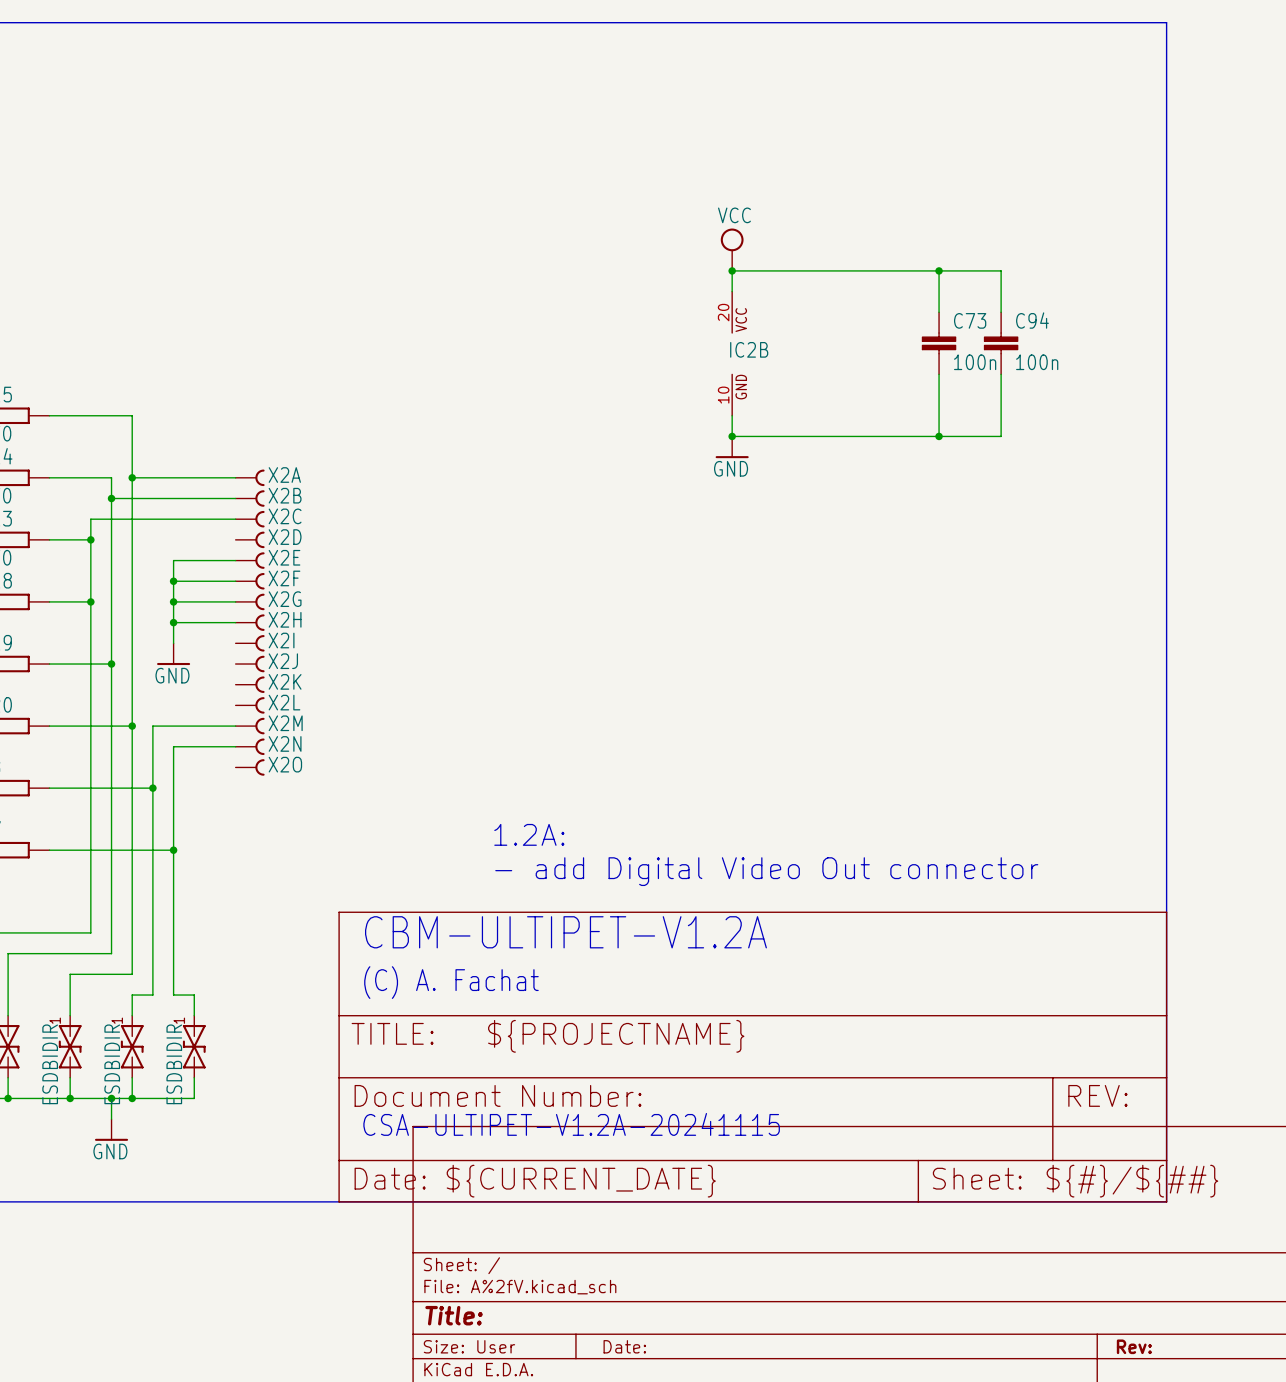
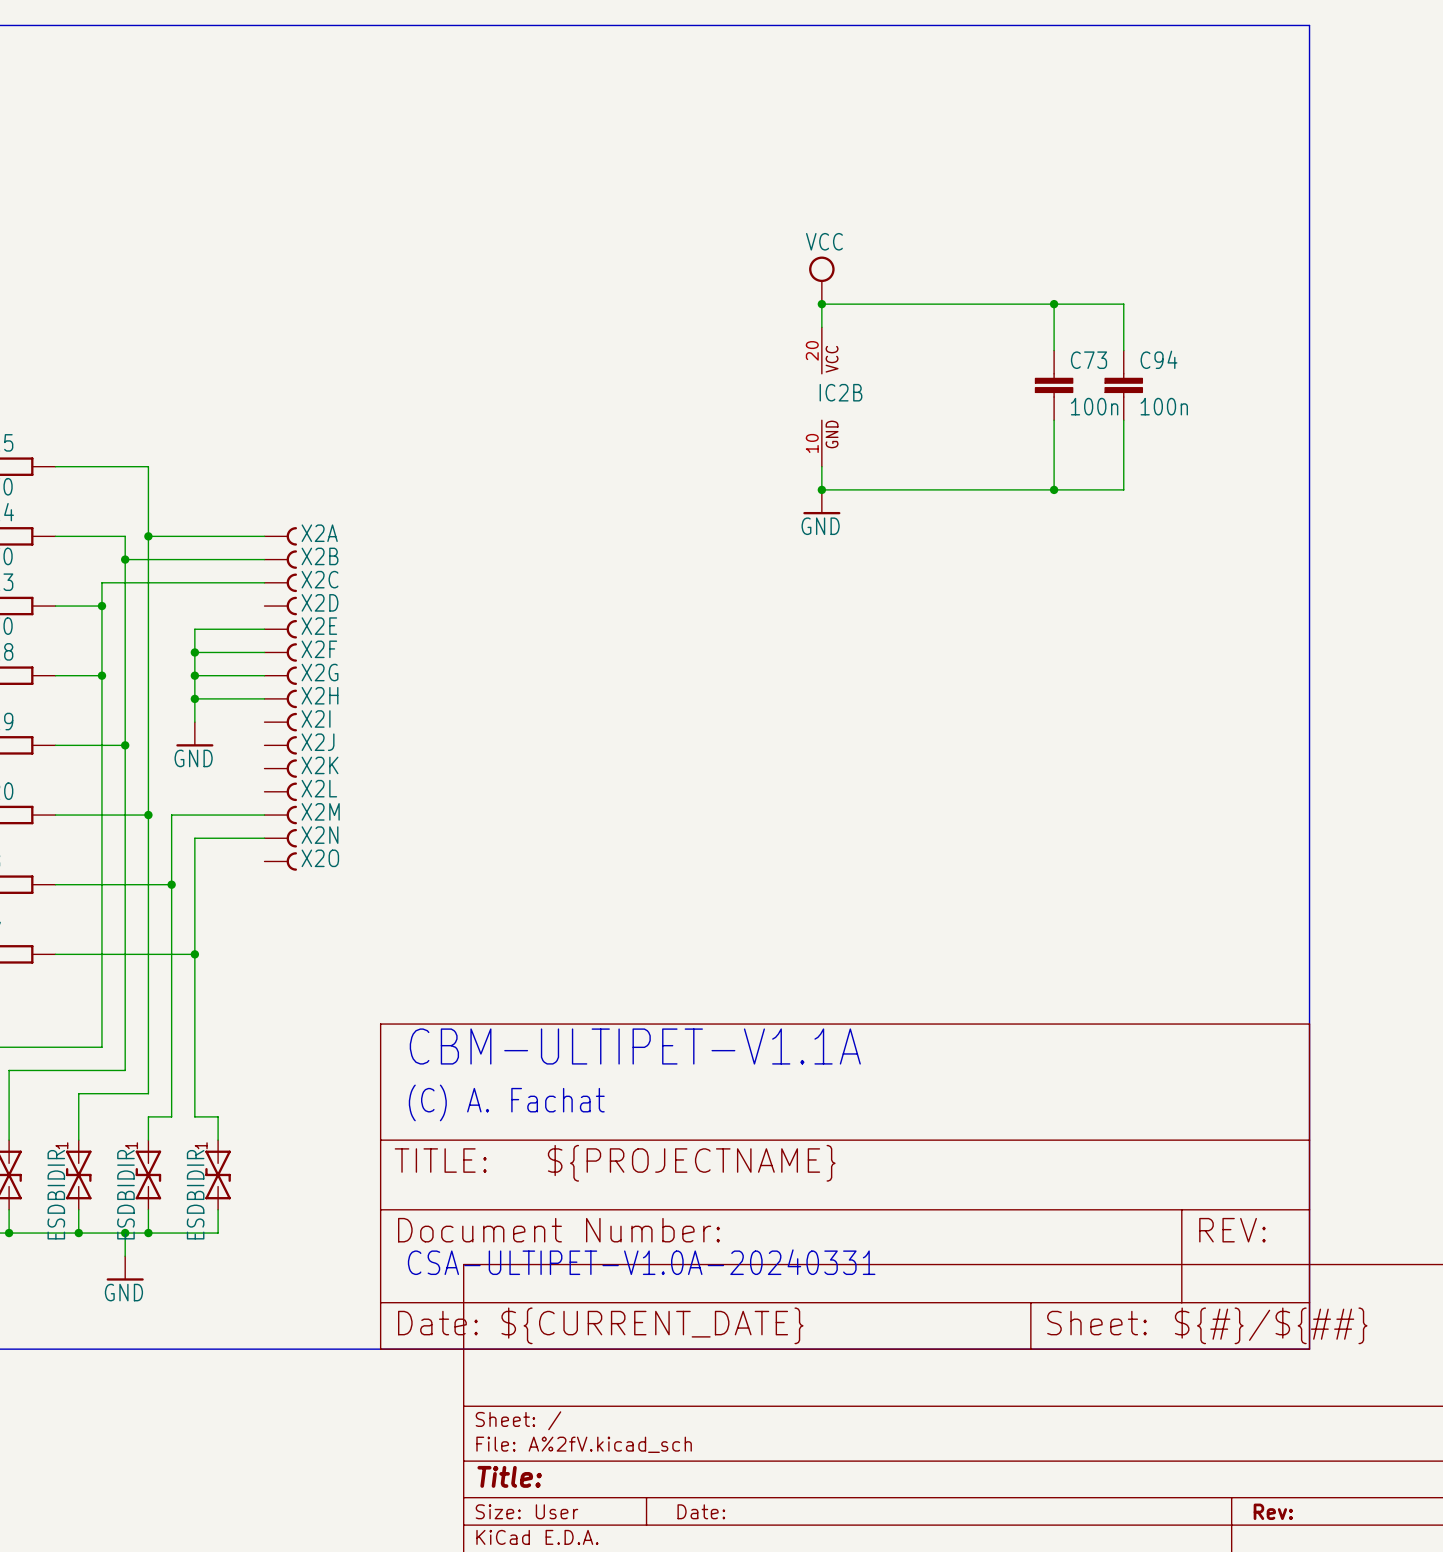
text: 1.2A: (529, 834) -> none
text: - add Digital Video Out connector (766, 871) -> none
text: CBM-ULTIPET-V1.2A (565, 932) -> CBM-ULTIPET-V1.1A (635, 1046)
text: CSA-ULTIPET-V1.2A-20241115 (571, 1124) -> CSA-ULTIPET-V1.0A-20240331 (641, 1262)

